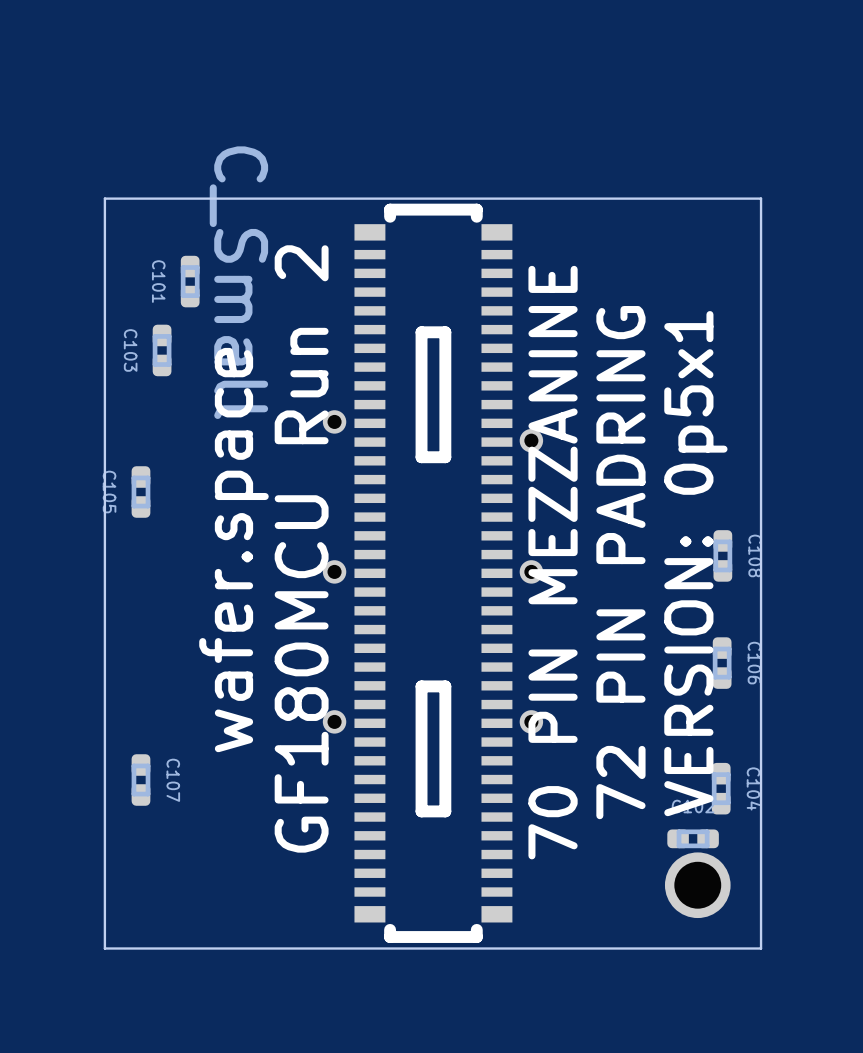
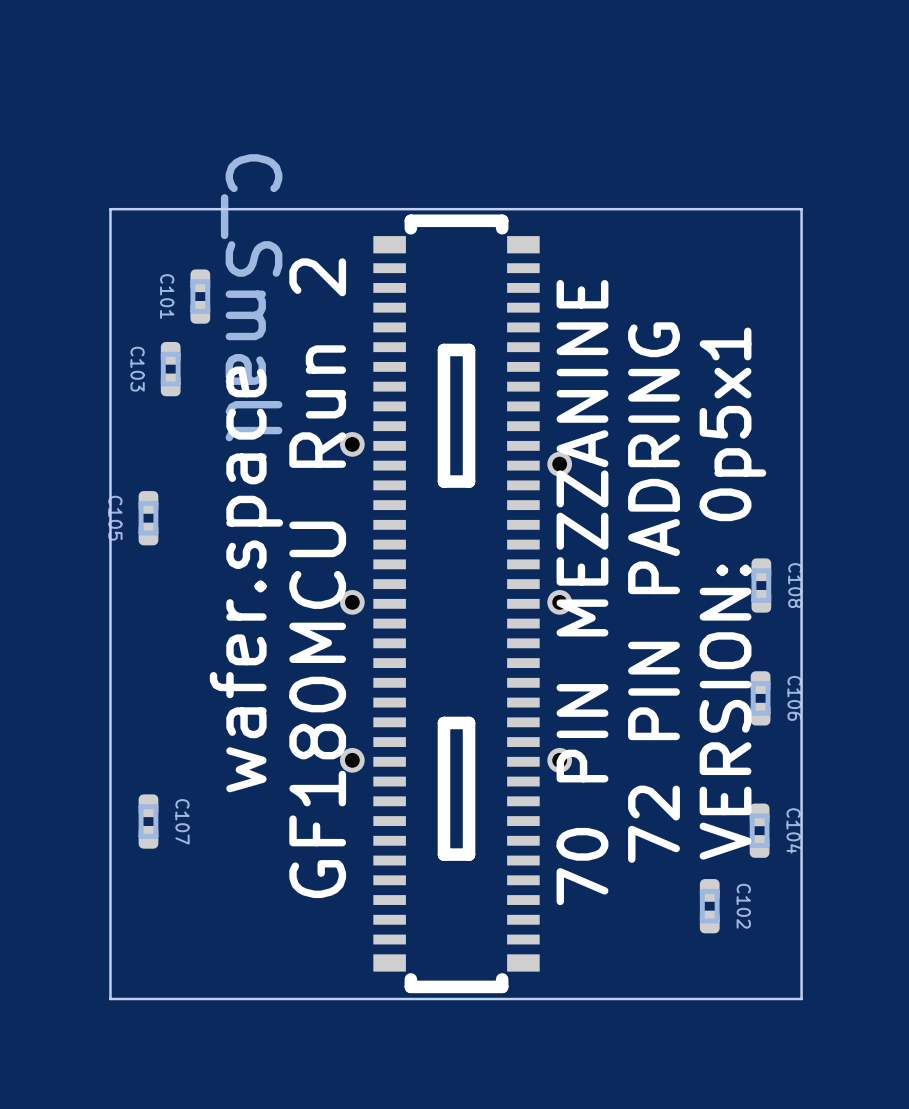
C102 rotation: 0° (693, 838) -> 90° clockwise (709, 906)
part: (697, 885) -> none

